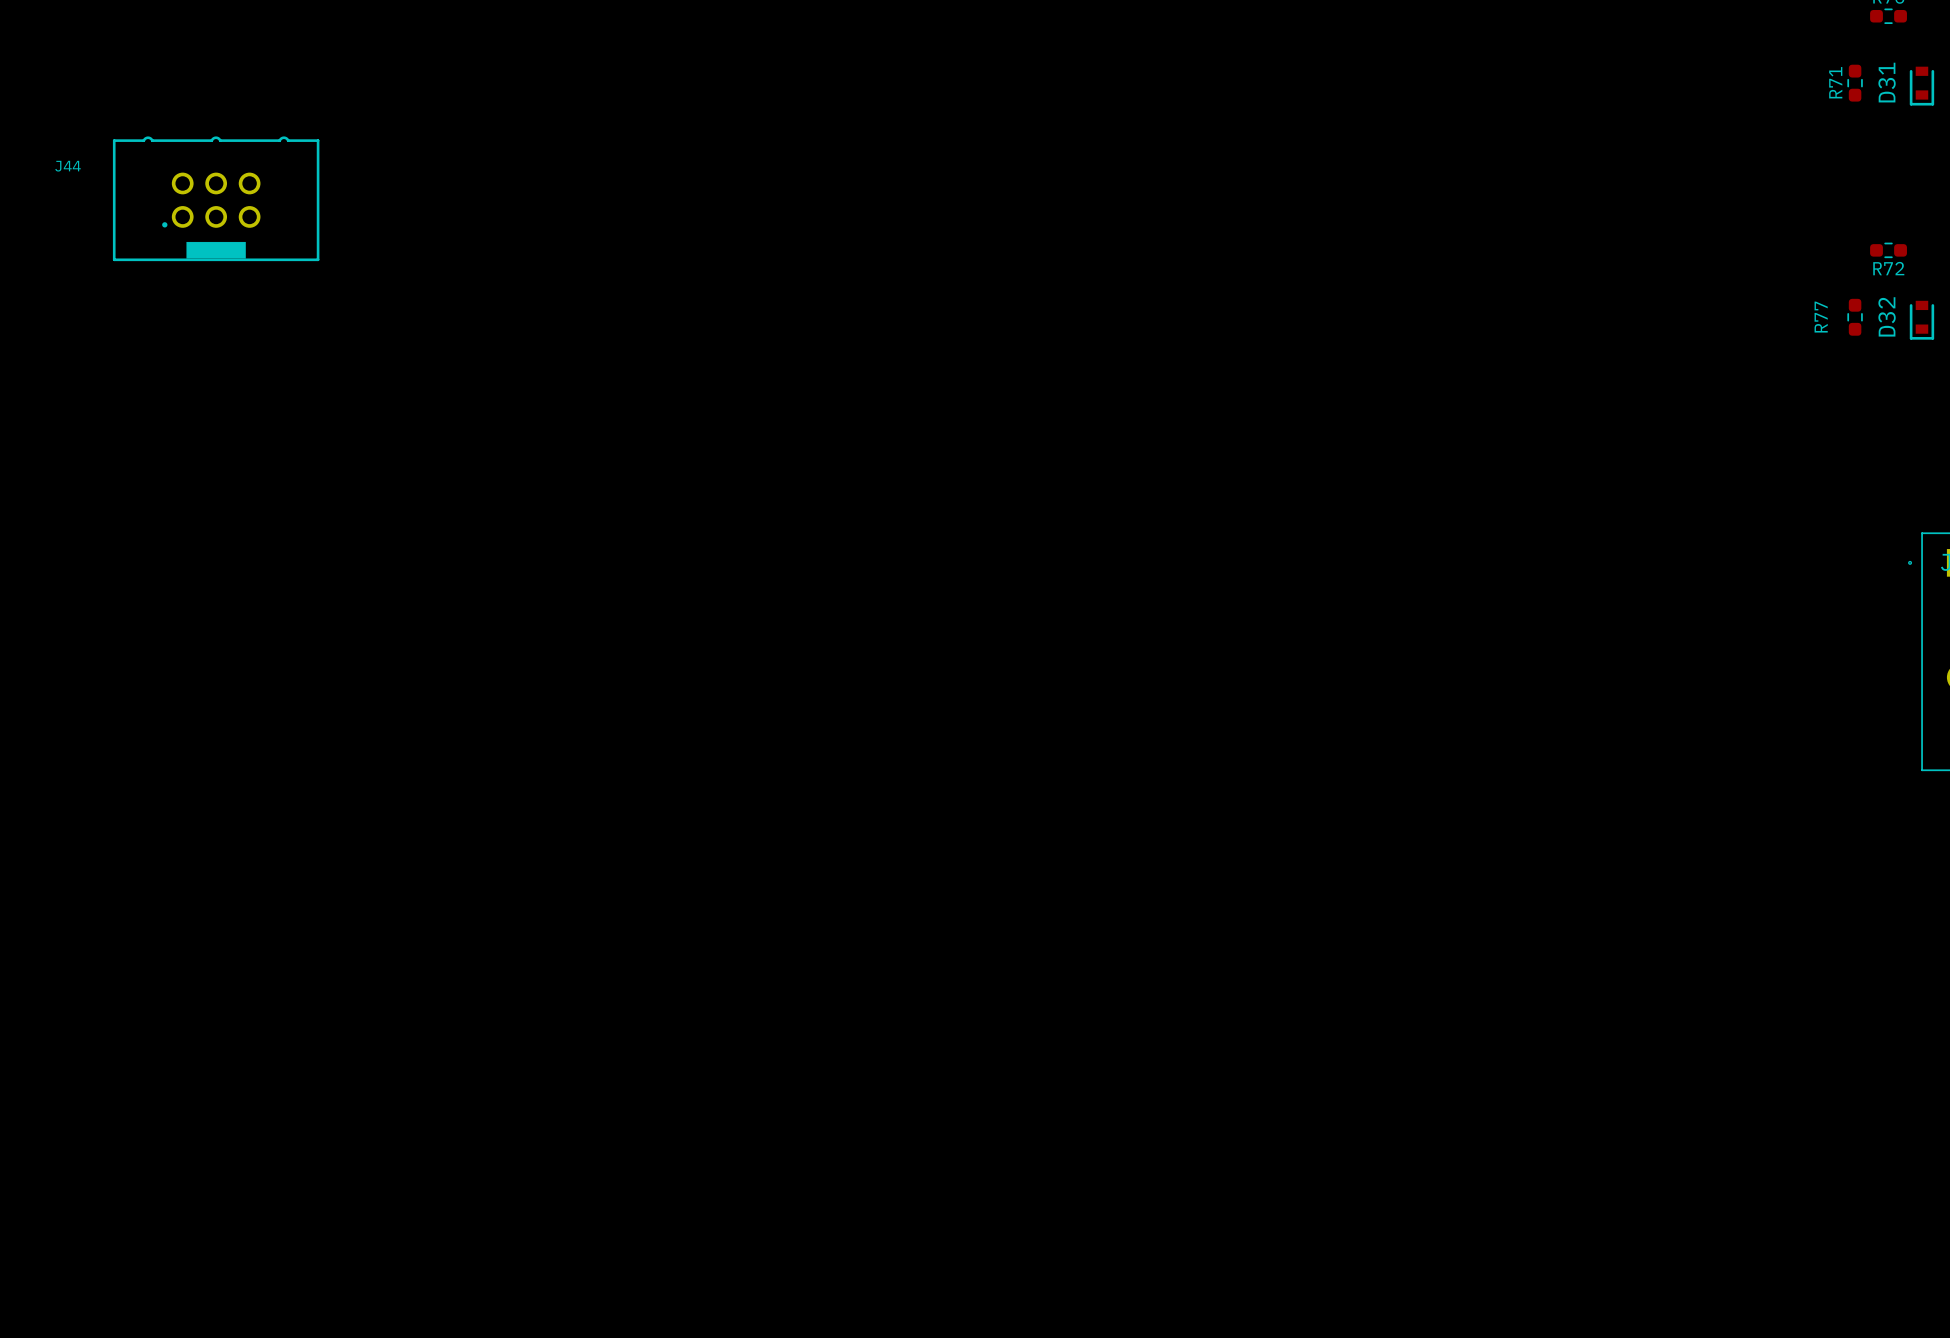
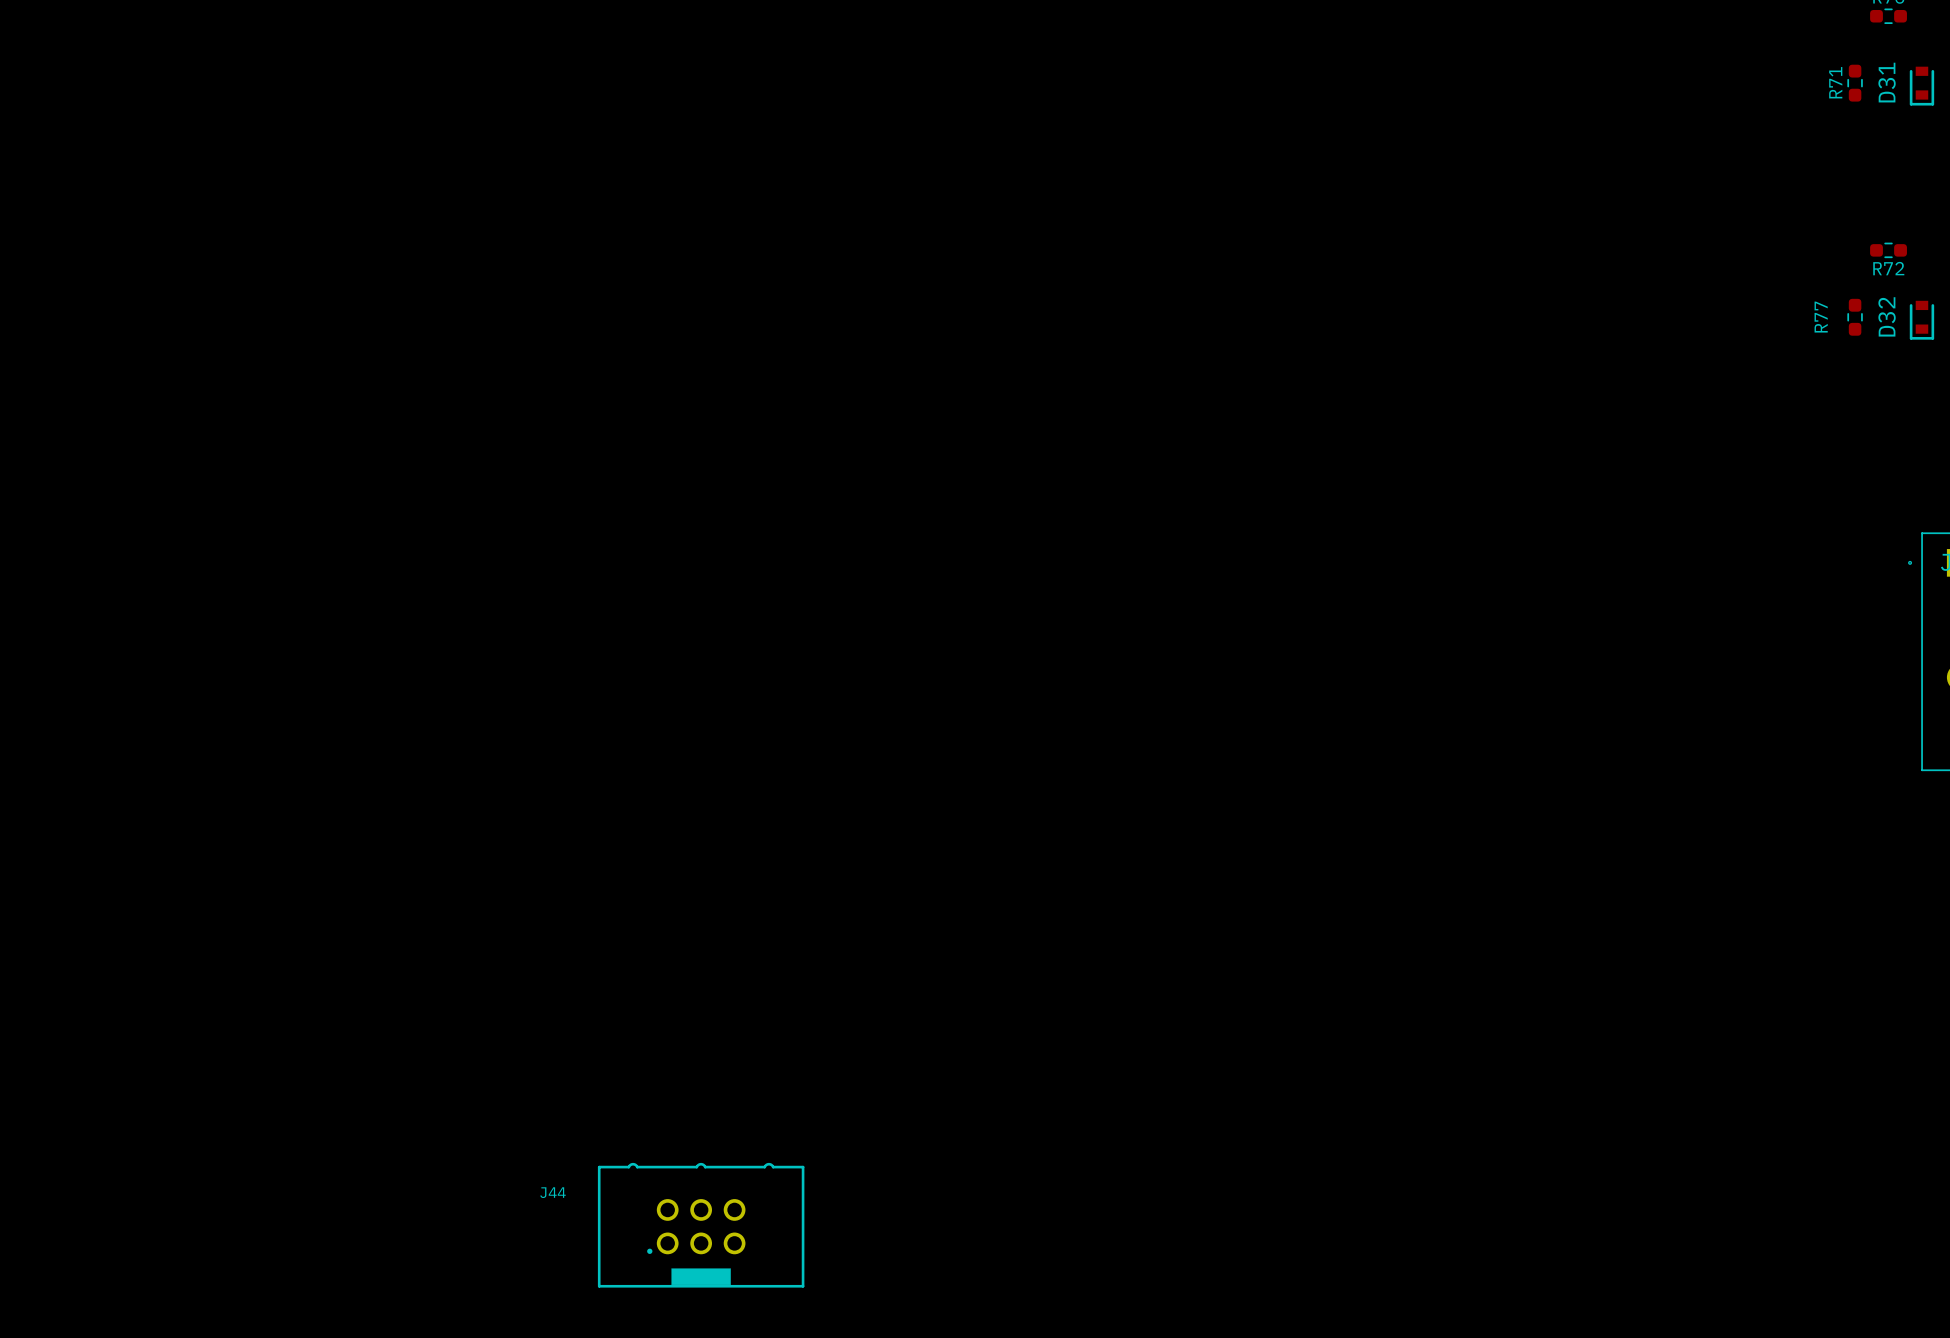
J44 position: (216, 198) -> (701, 1225)

